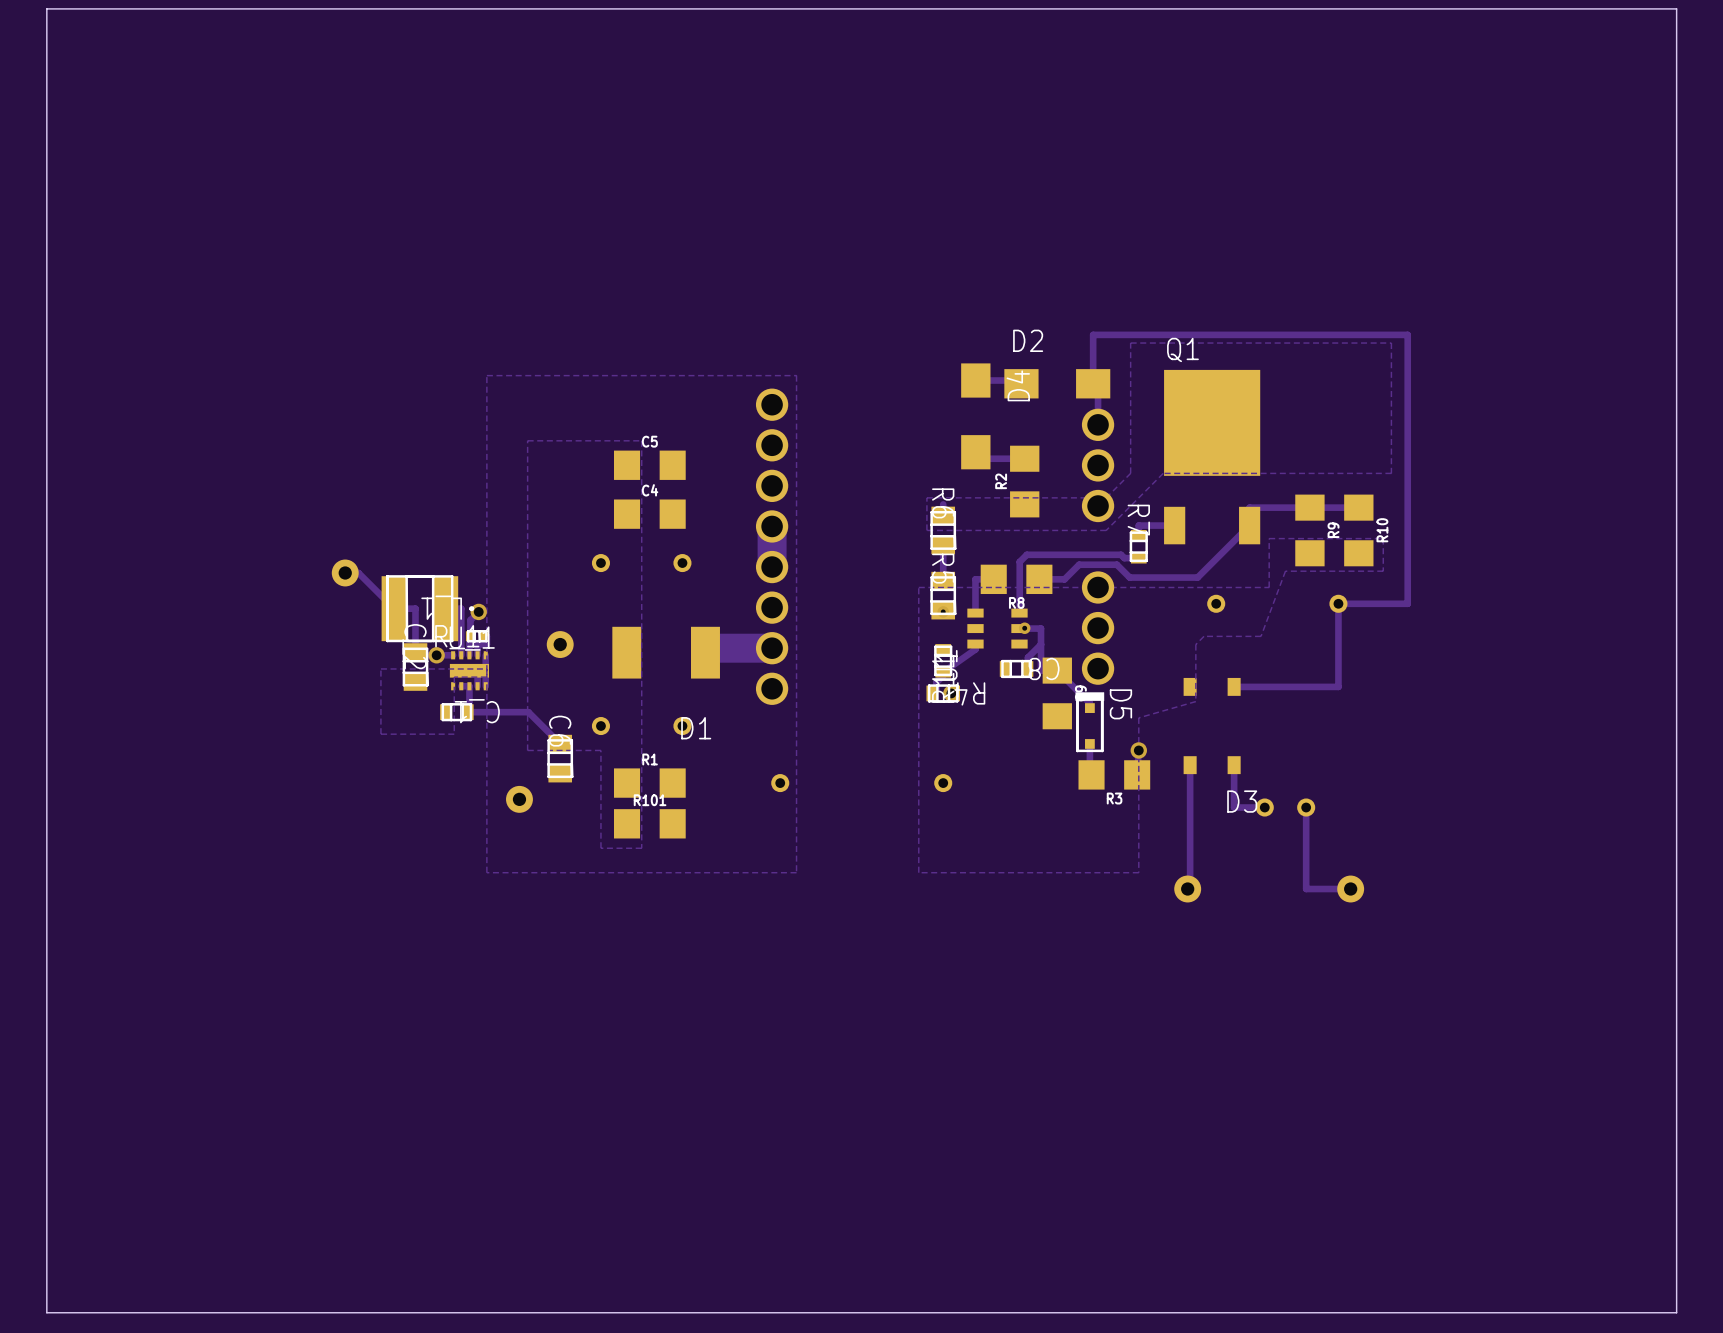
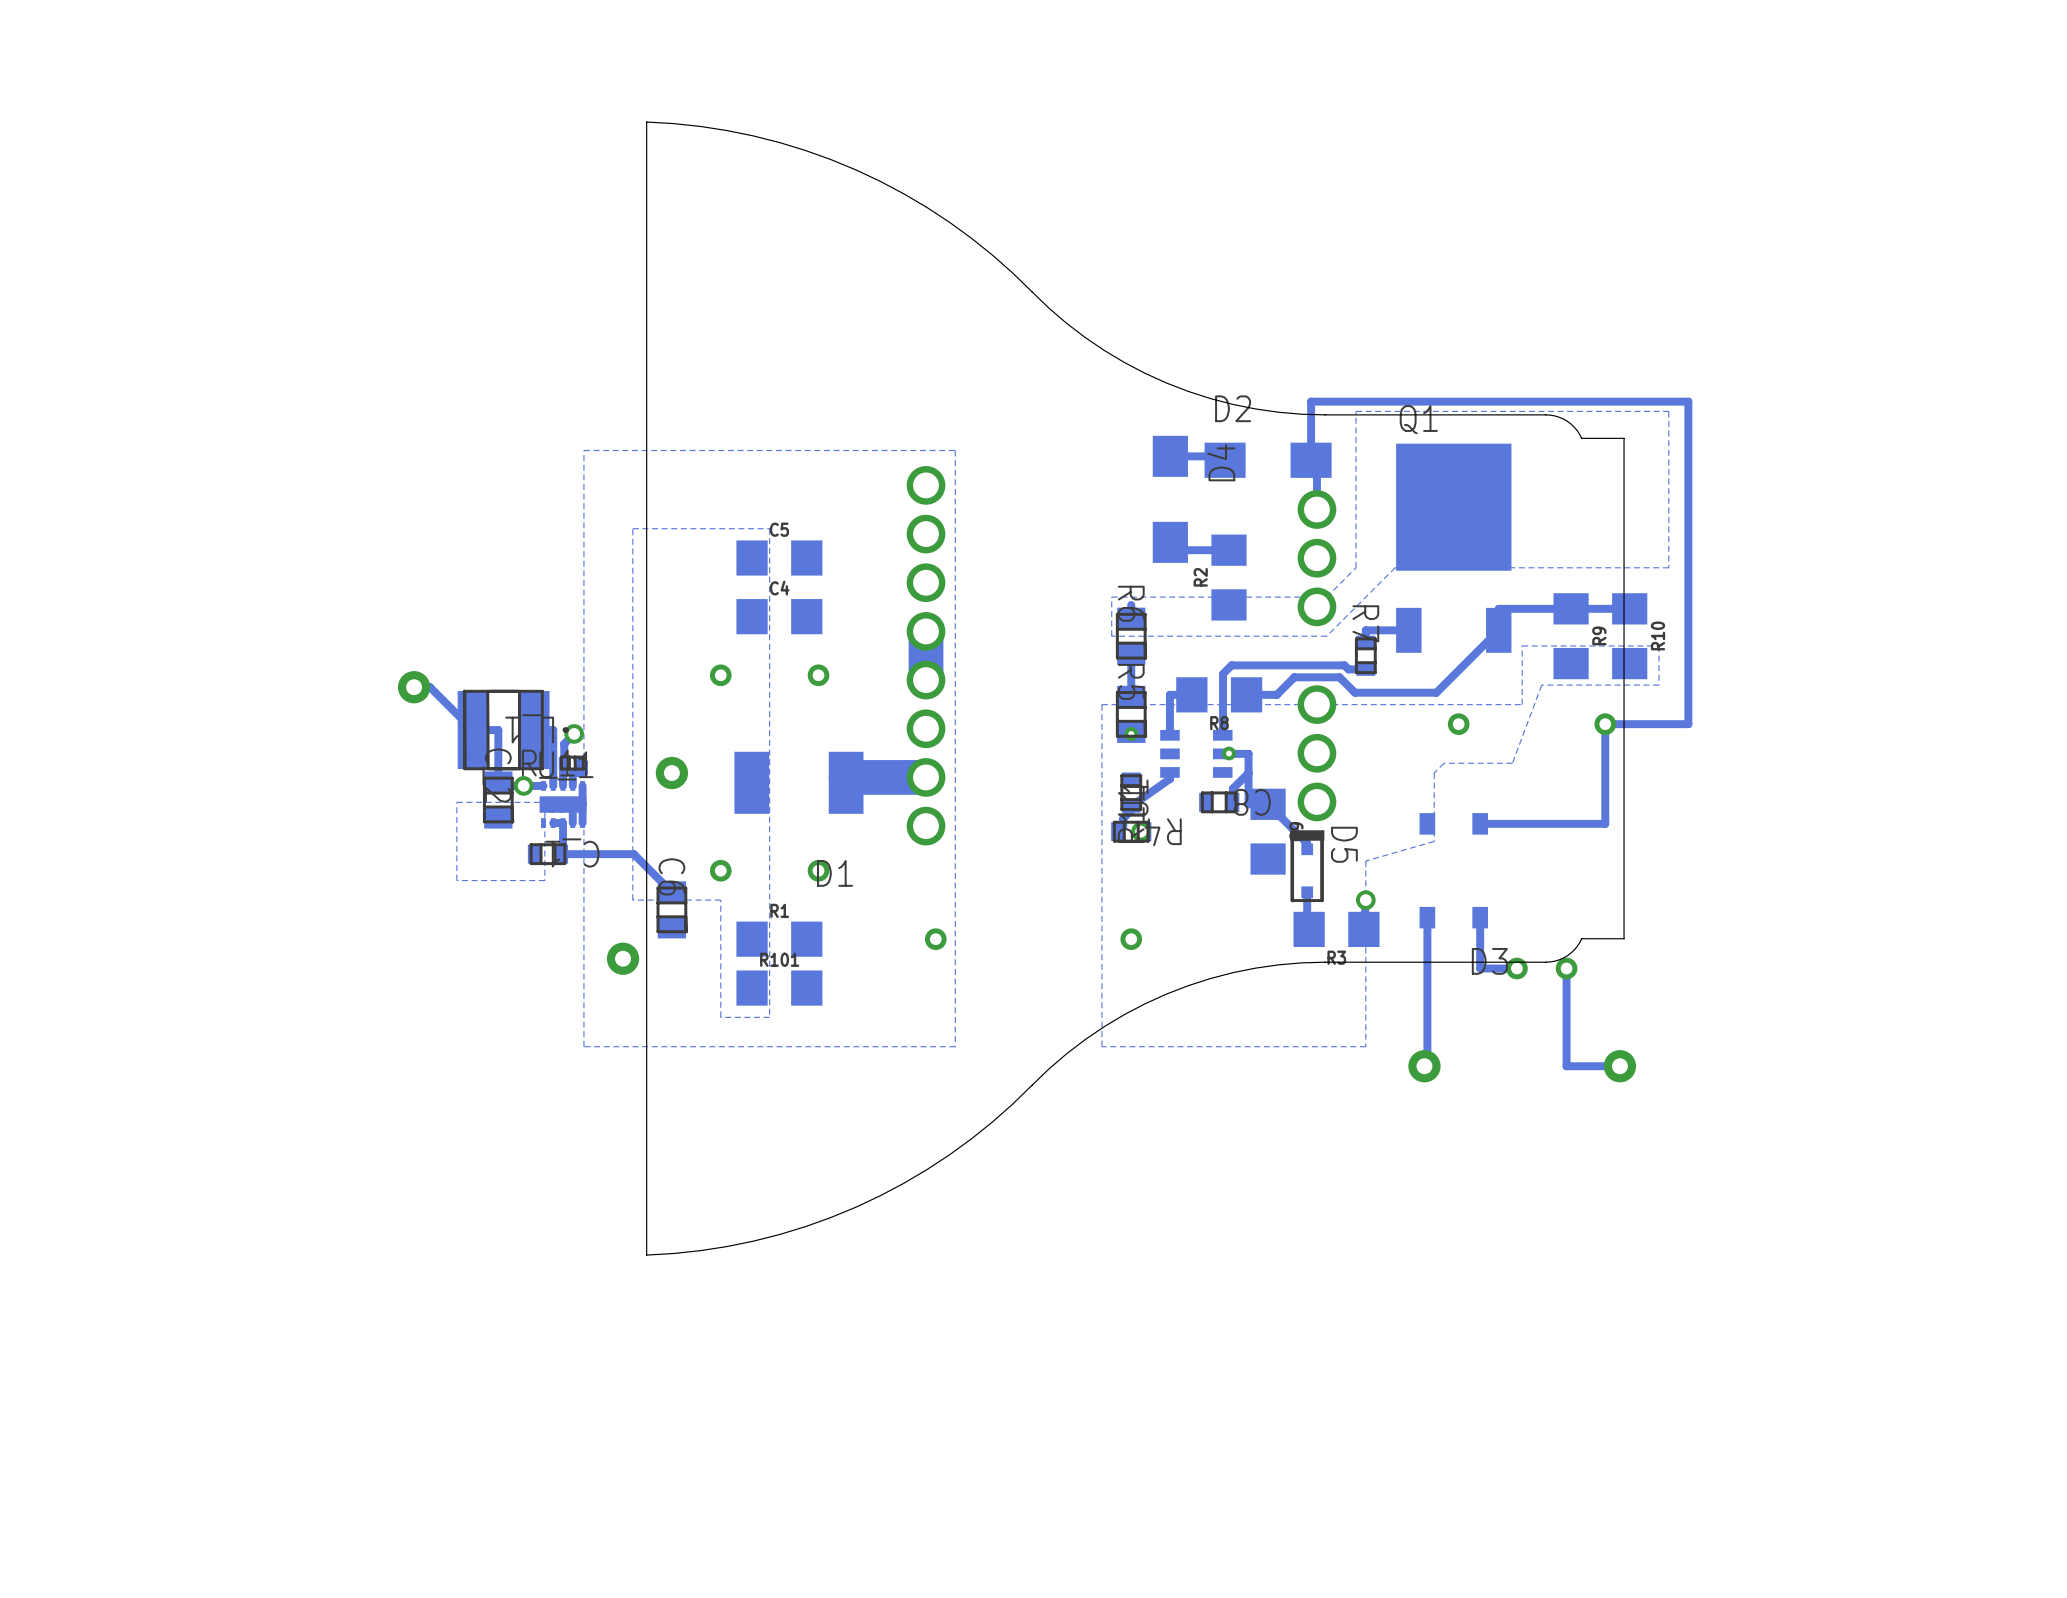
board edge: (1676, 8) (46, 8) (46, 1312) (1676, 1312) (1676, 8) -> none
board edge: none -> (646, 122) (646, 1255) (700, 1250) (753, 1241) (805, 1226) (880, 1195) (927, 1169) (971, 1138) (1012, 1104) (1048, 1069) (1084, 1039) (1144, 1003) (1187, 985) (1232, 972) (1301, 962) (1550, 961) (1559, 959) (1570, 953) (1581, 938) (1624, 938) (1624, 438) (1581, 438) (1570, 423) (1559, 417) (1550, 415) (1301, 414) (1232, 404) (1187, 391) (1144, 373) (1084, 337) (1048, 307) (1012, 272) (971, 238) (927, 207) (880, 181) (805, 150) (753, 135) (700, 126) (646, 122)

